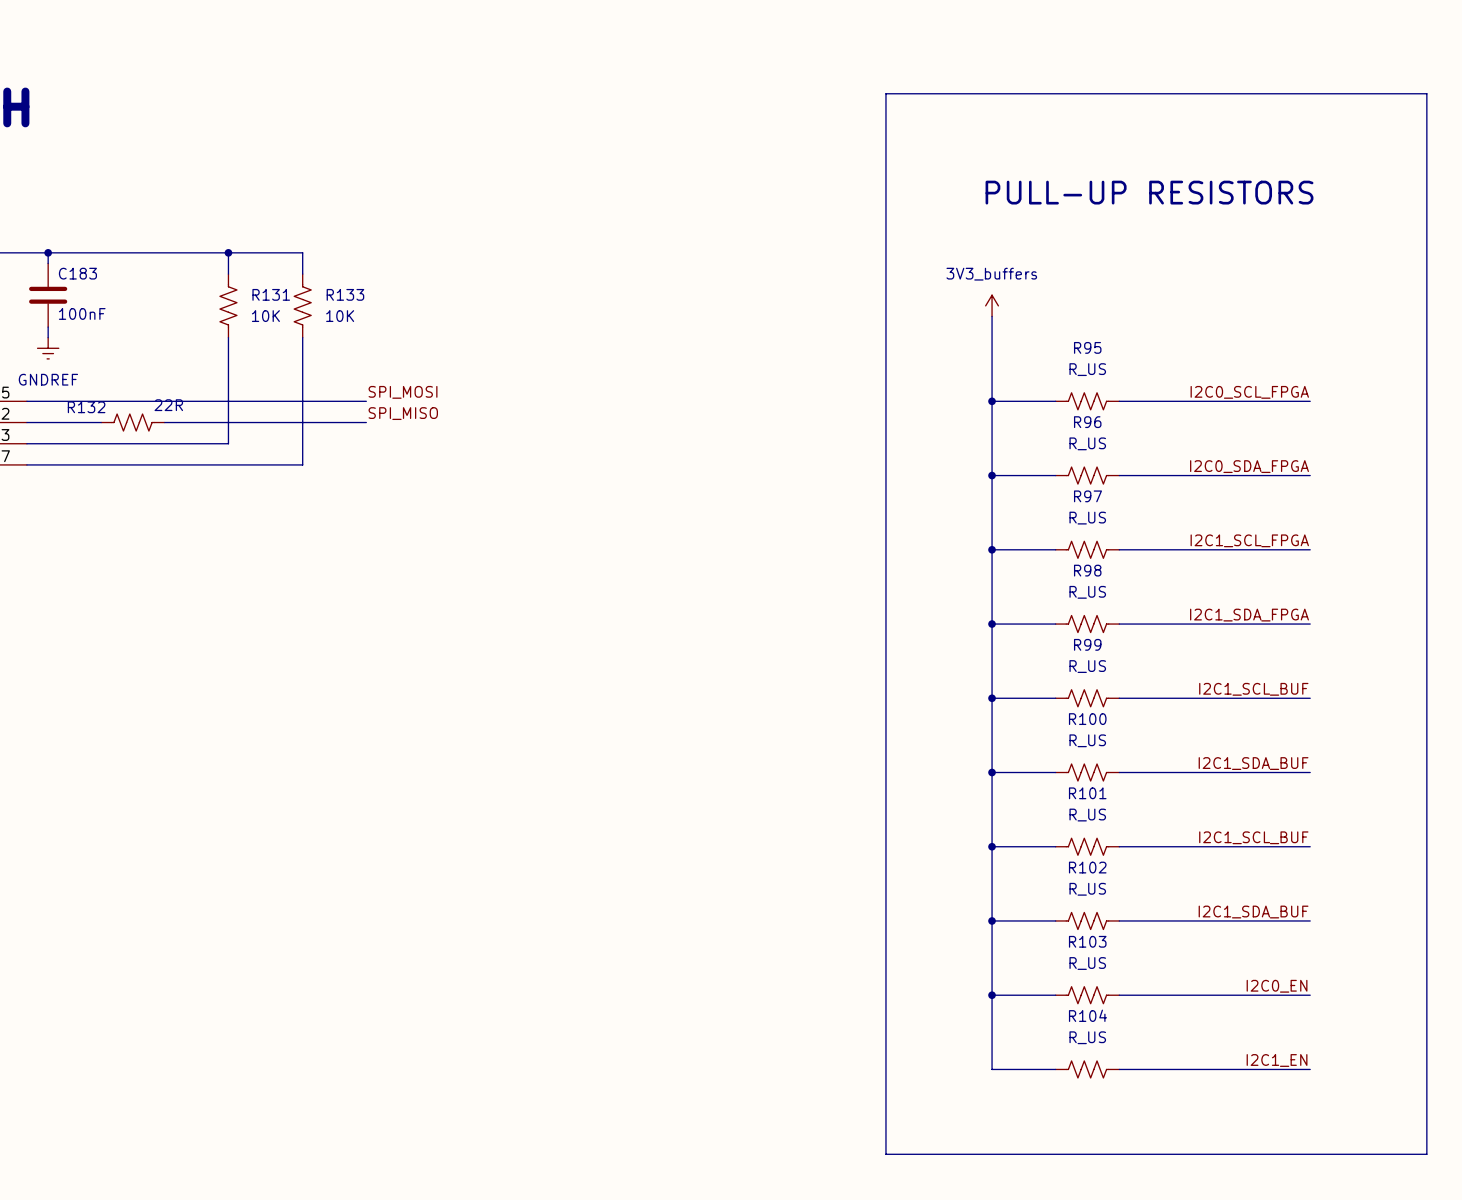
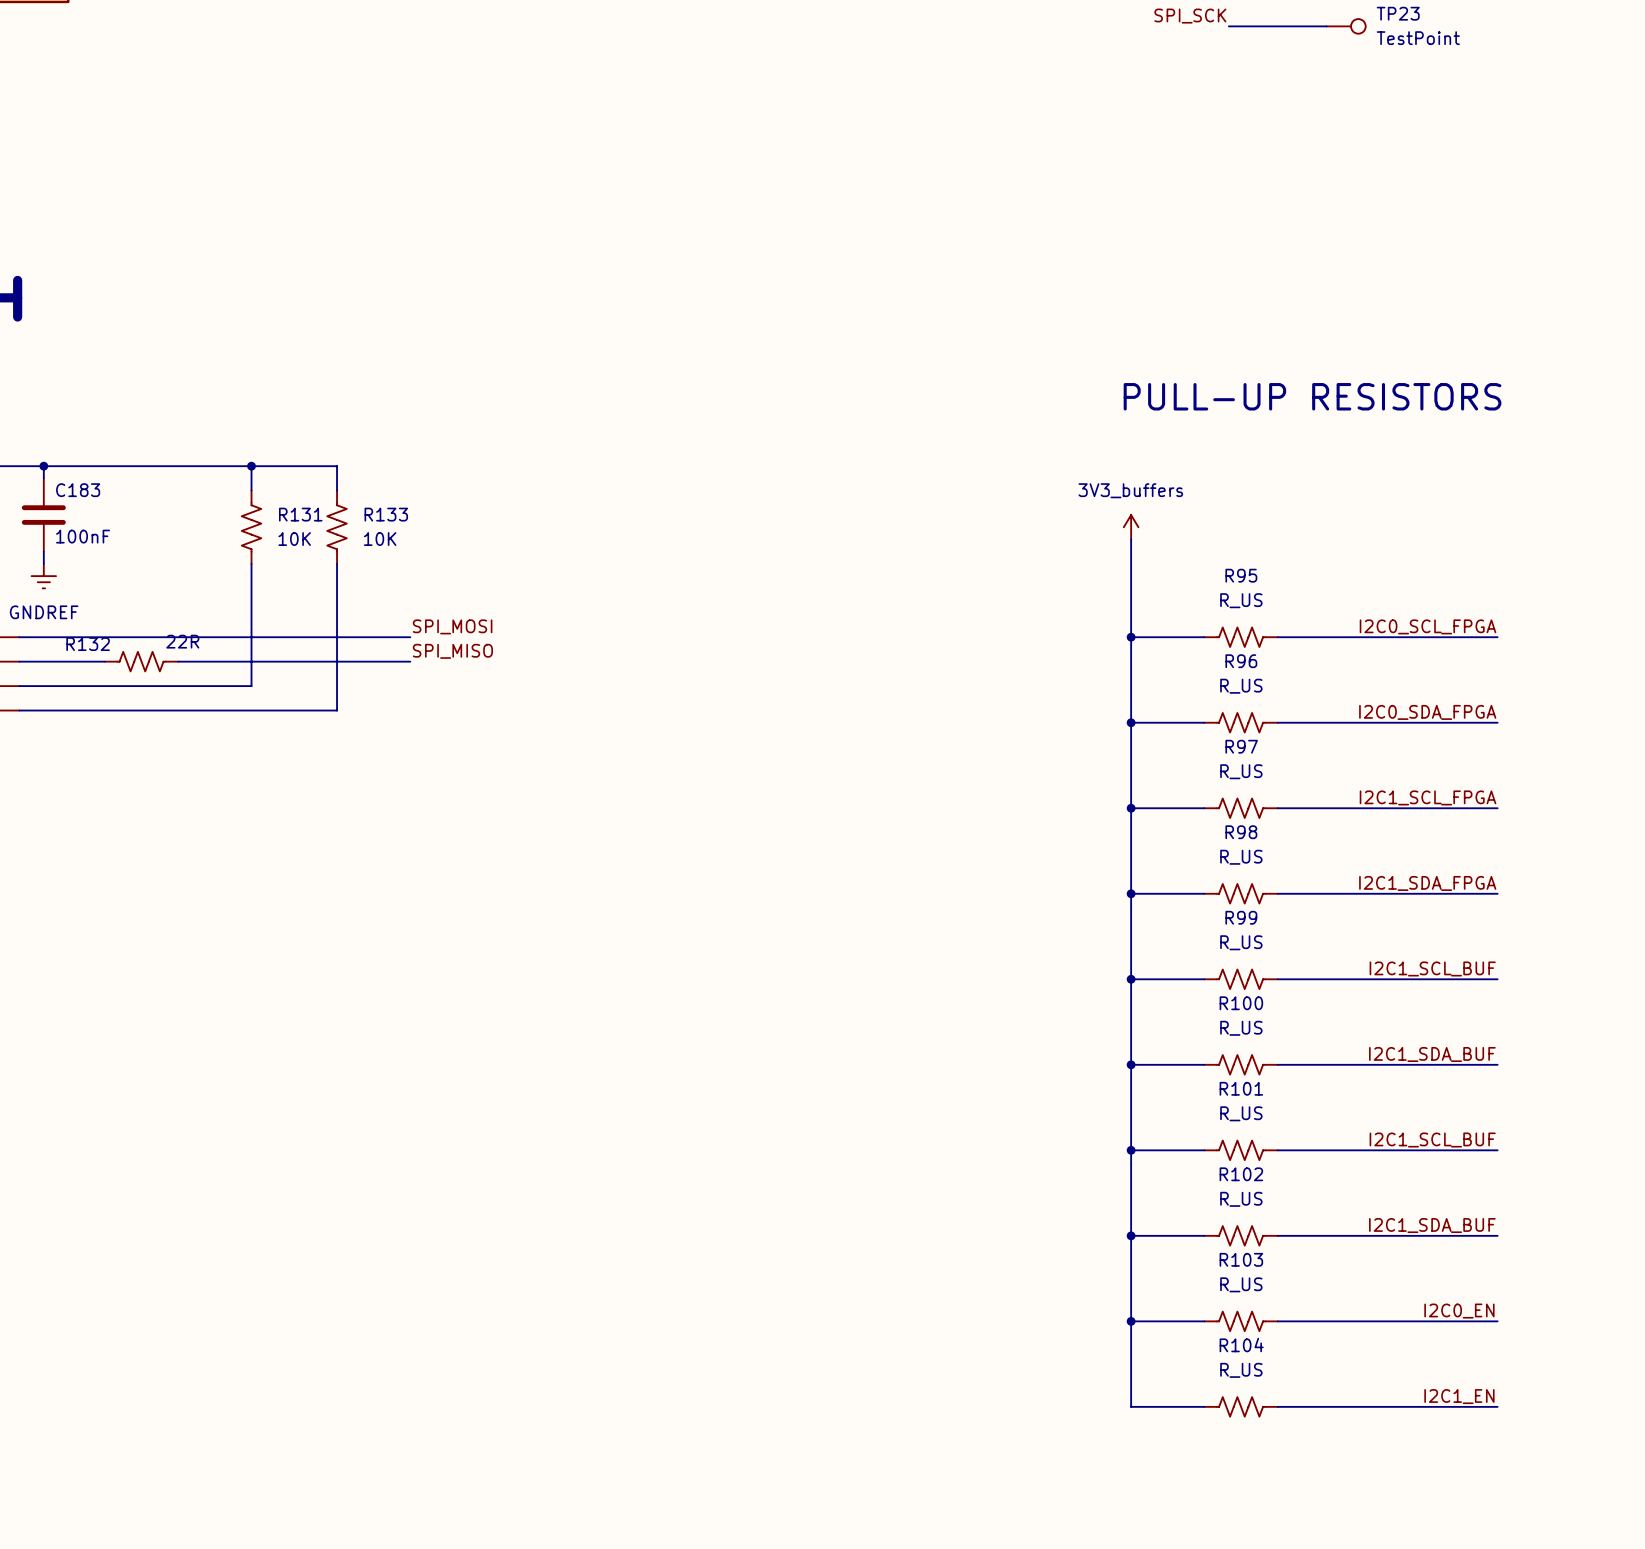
line: (885, 93) (1426, 93) (1426, 1154) (885, 1154) (885, 93) -> none

